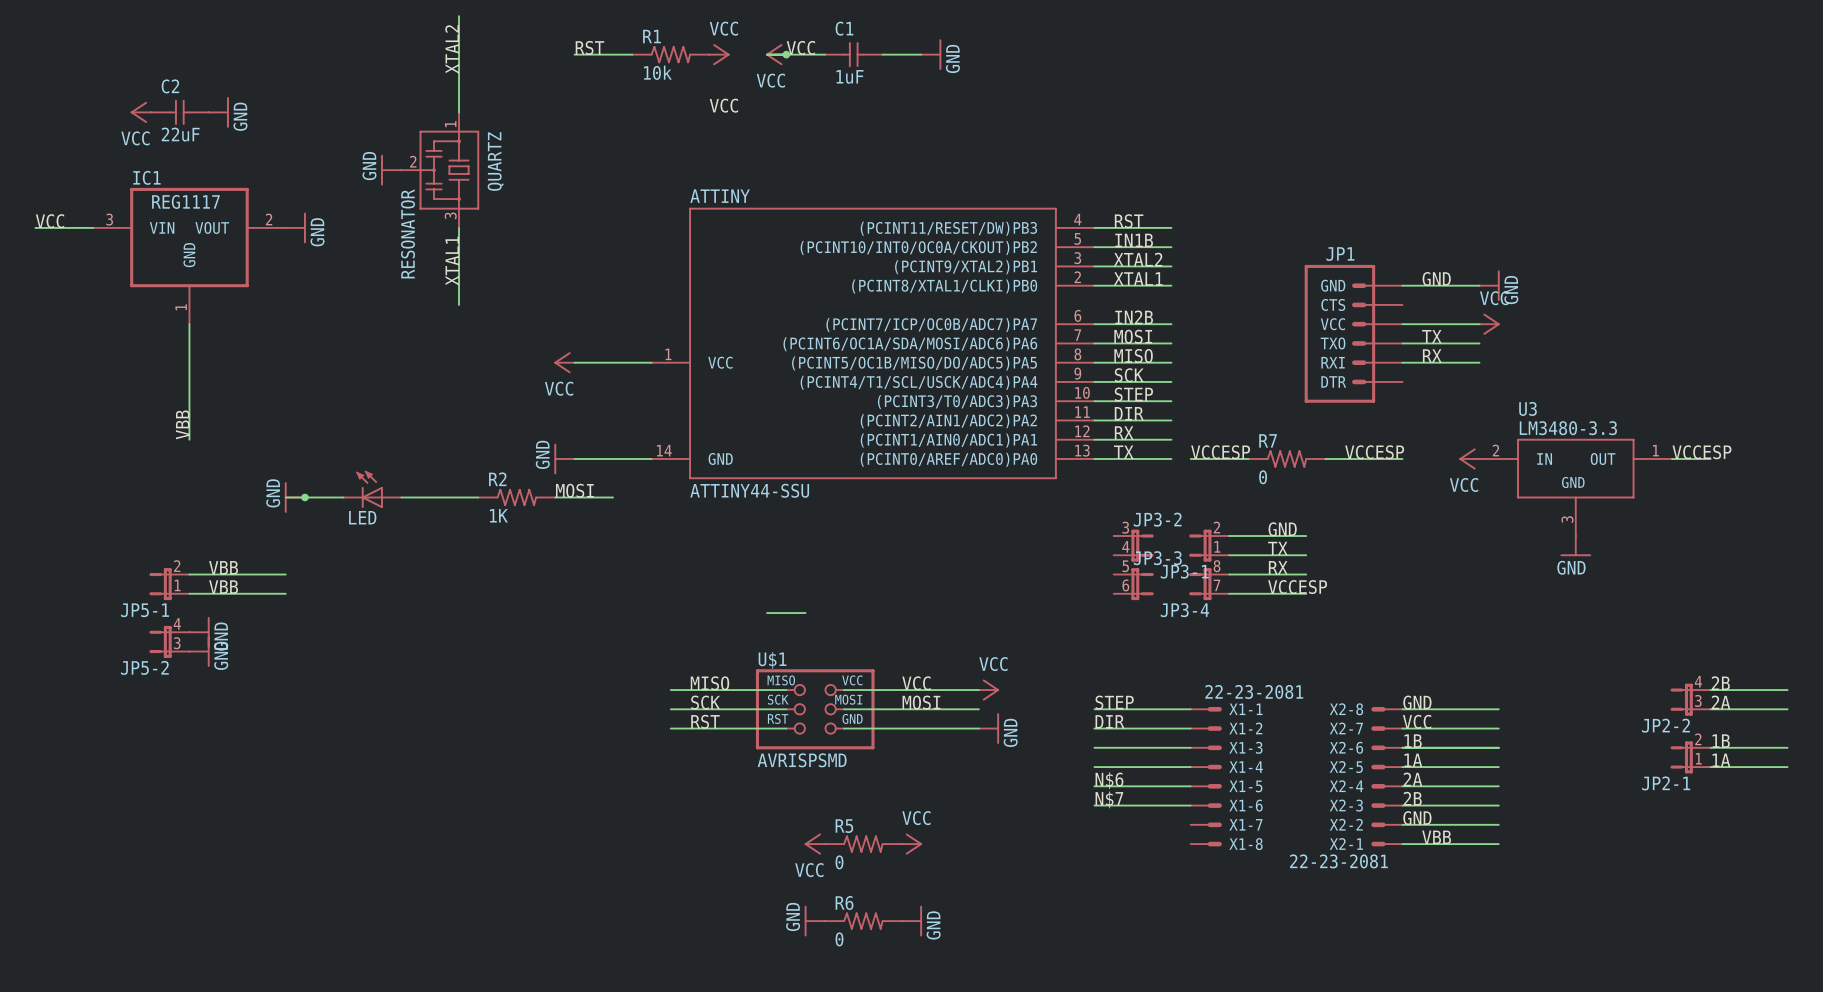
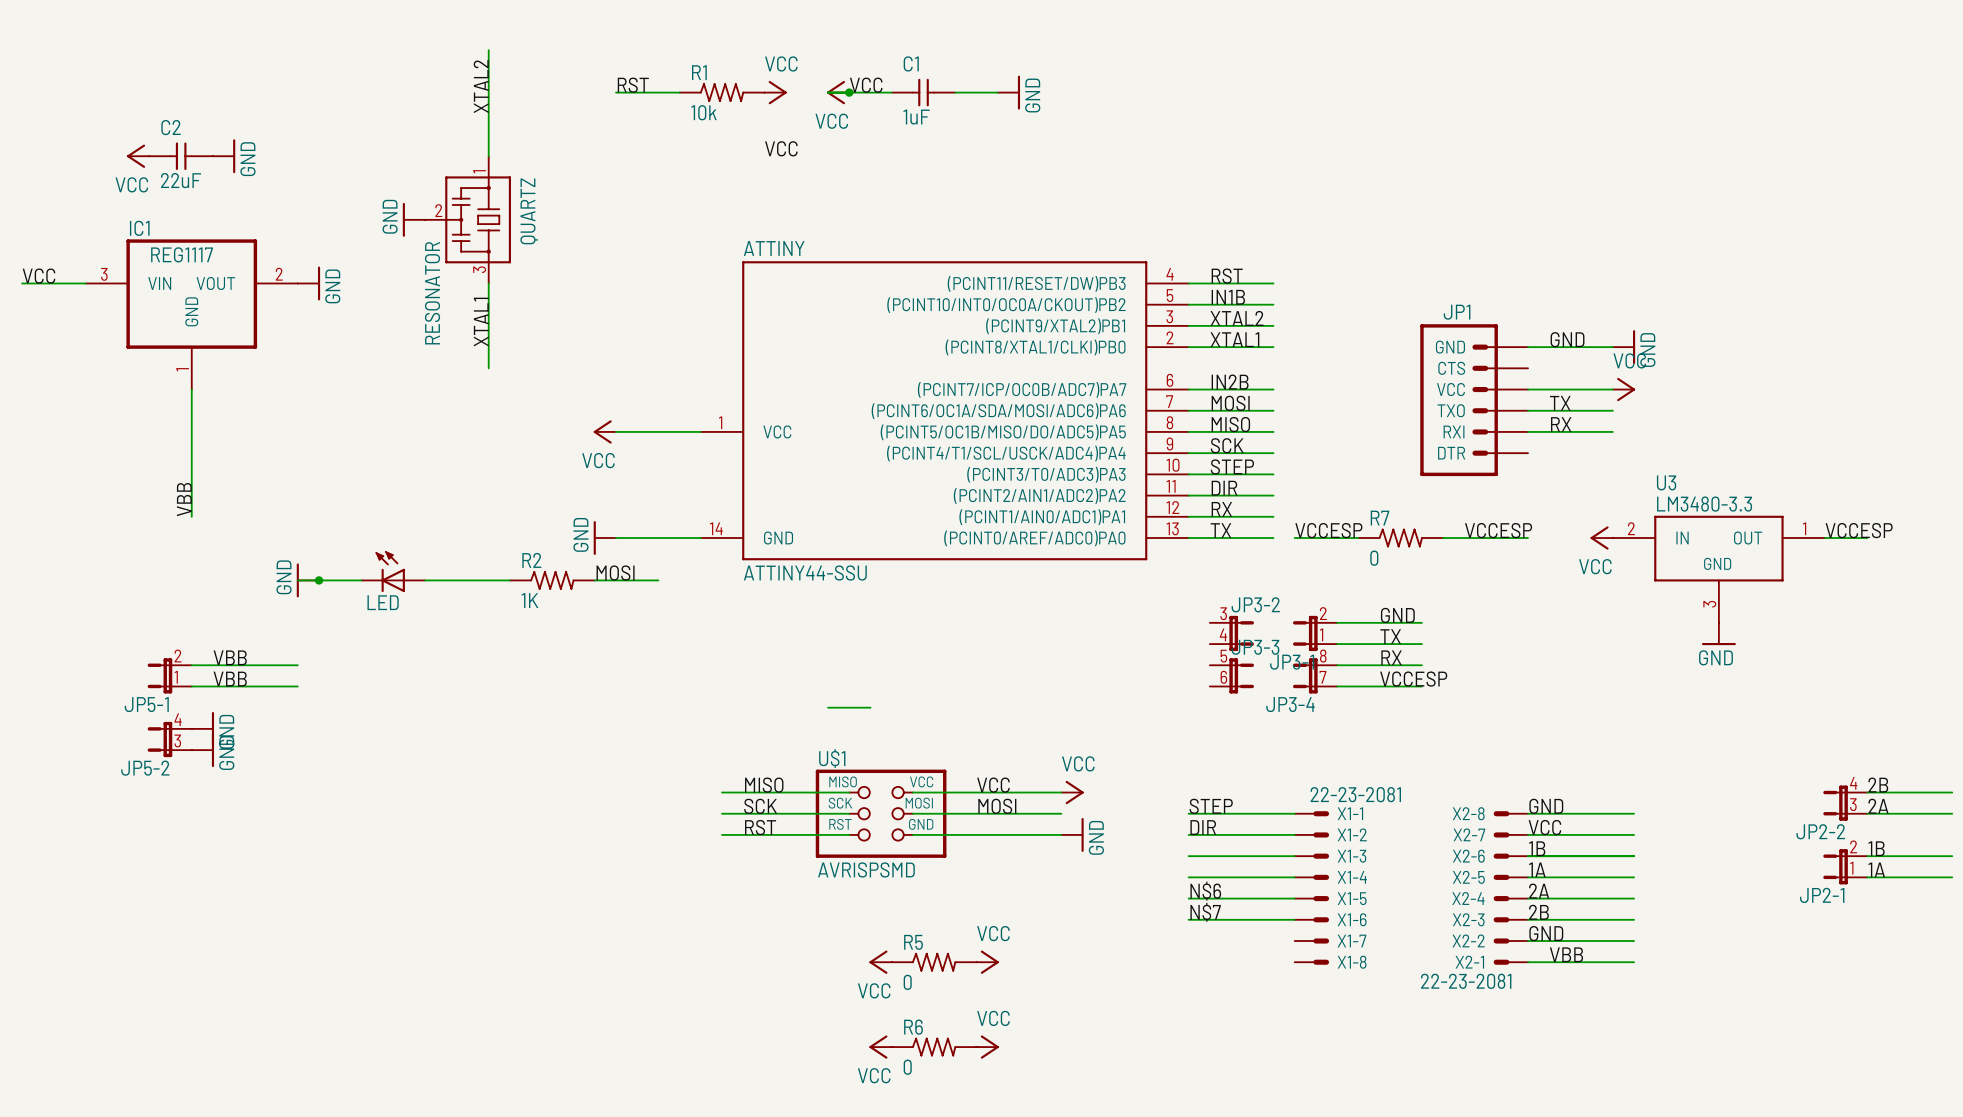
power symbol: GND (814, 921) -> VCC (880, 1047)
power symbol: GND (911, 921) -> VCC (987, 1047)

